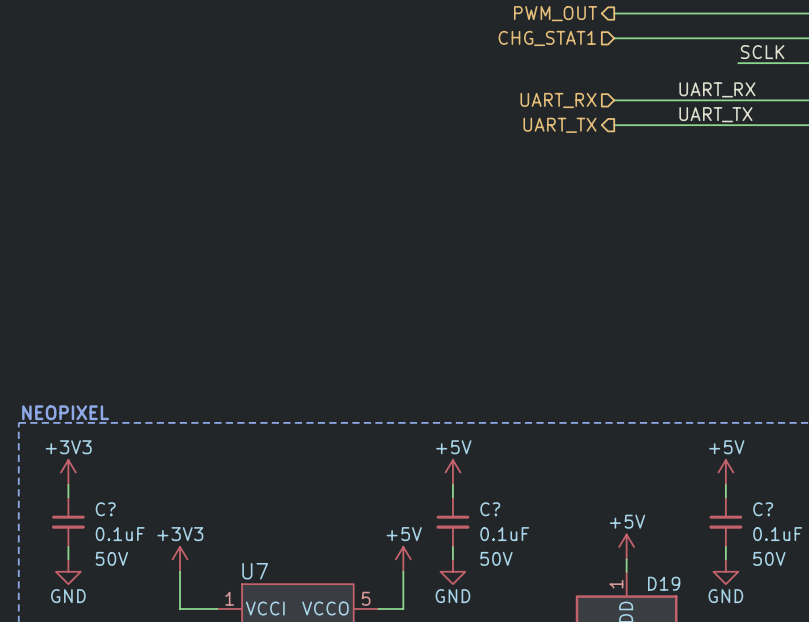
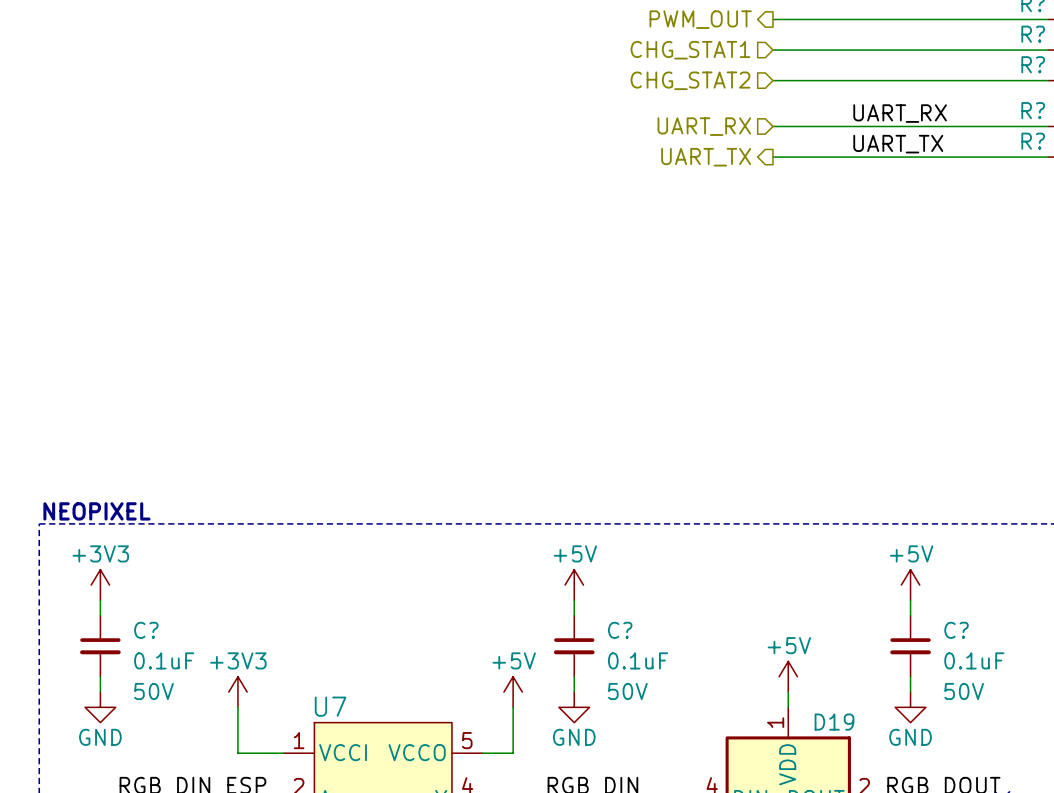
label: SCLK (762, 52) -> none
hierarchical label: none -> CHG_STAT2 (690, 80)
wire: none -> (772, 80) (925, 80)

